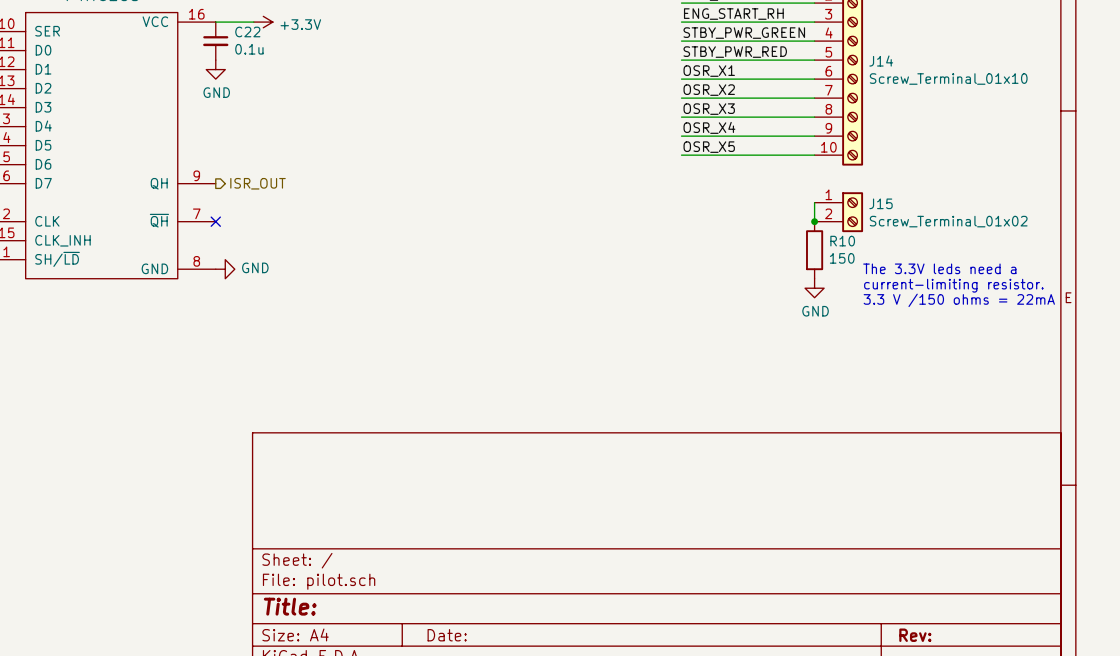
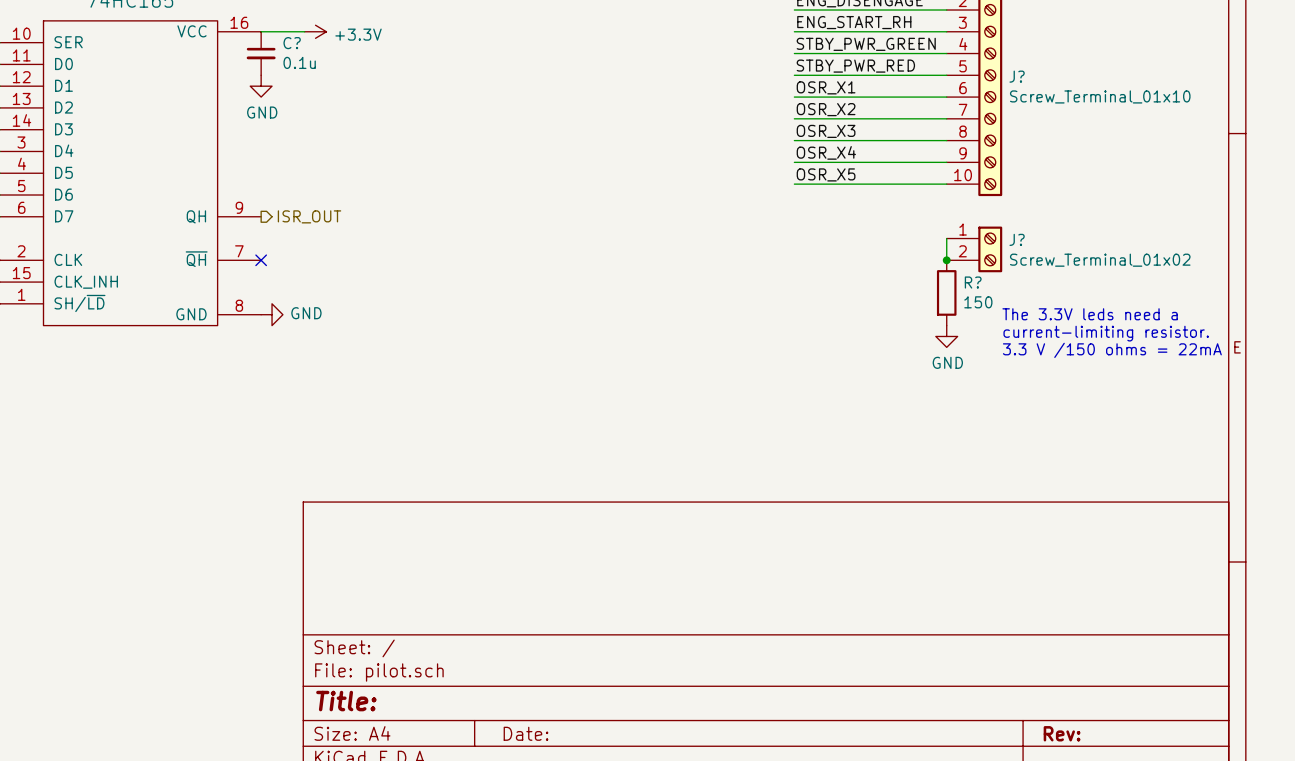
C22 name: C22 (247, 31) -> C? (292, 43)
J14 name: J14 (881, 61) -> J? (1017, 76)
J15 name: J15 (881, 203) -> J? (1017, 239)
R10 name: R10 (842, 241) -> R? (973, 282)

